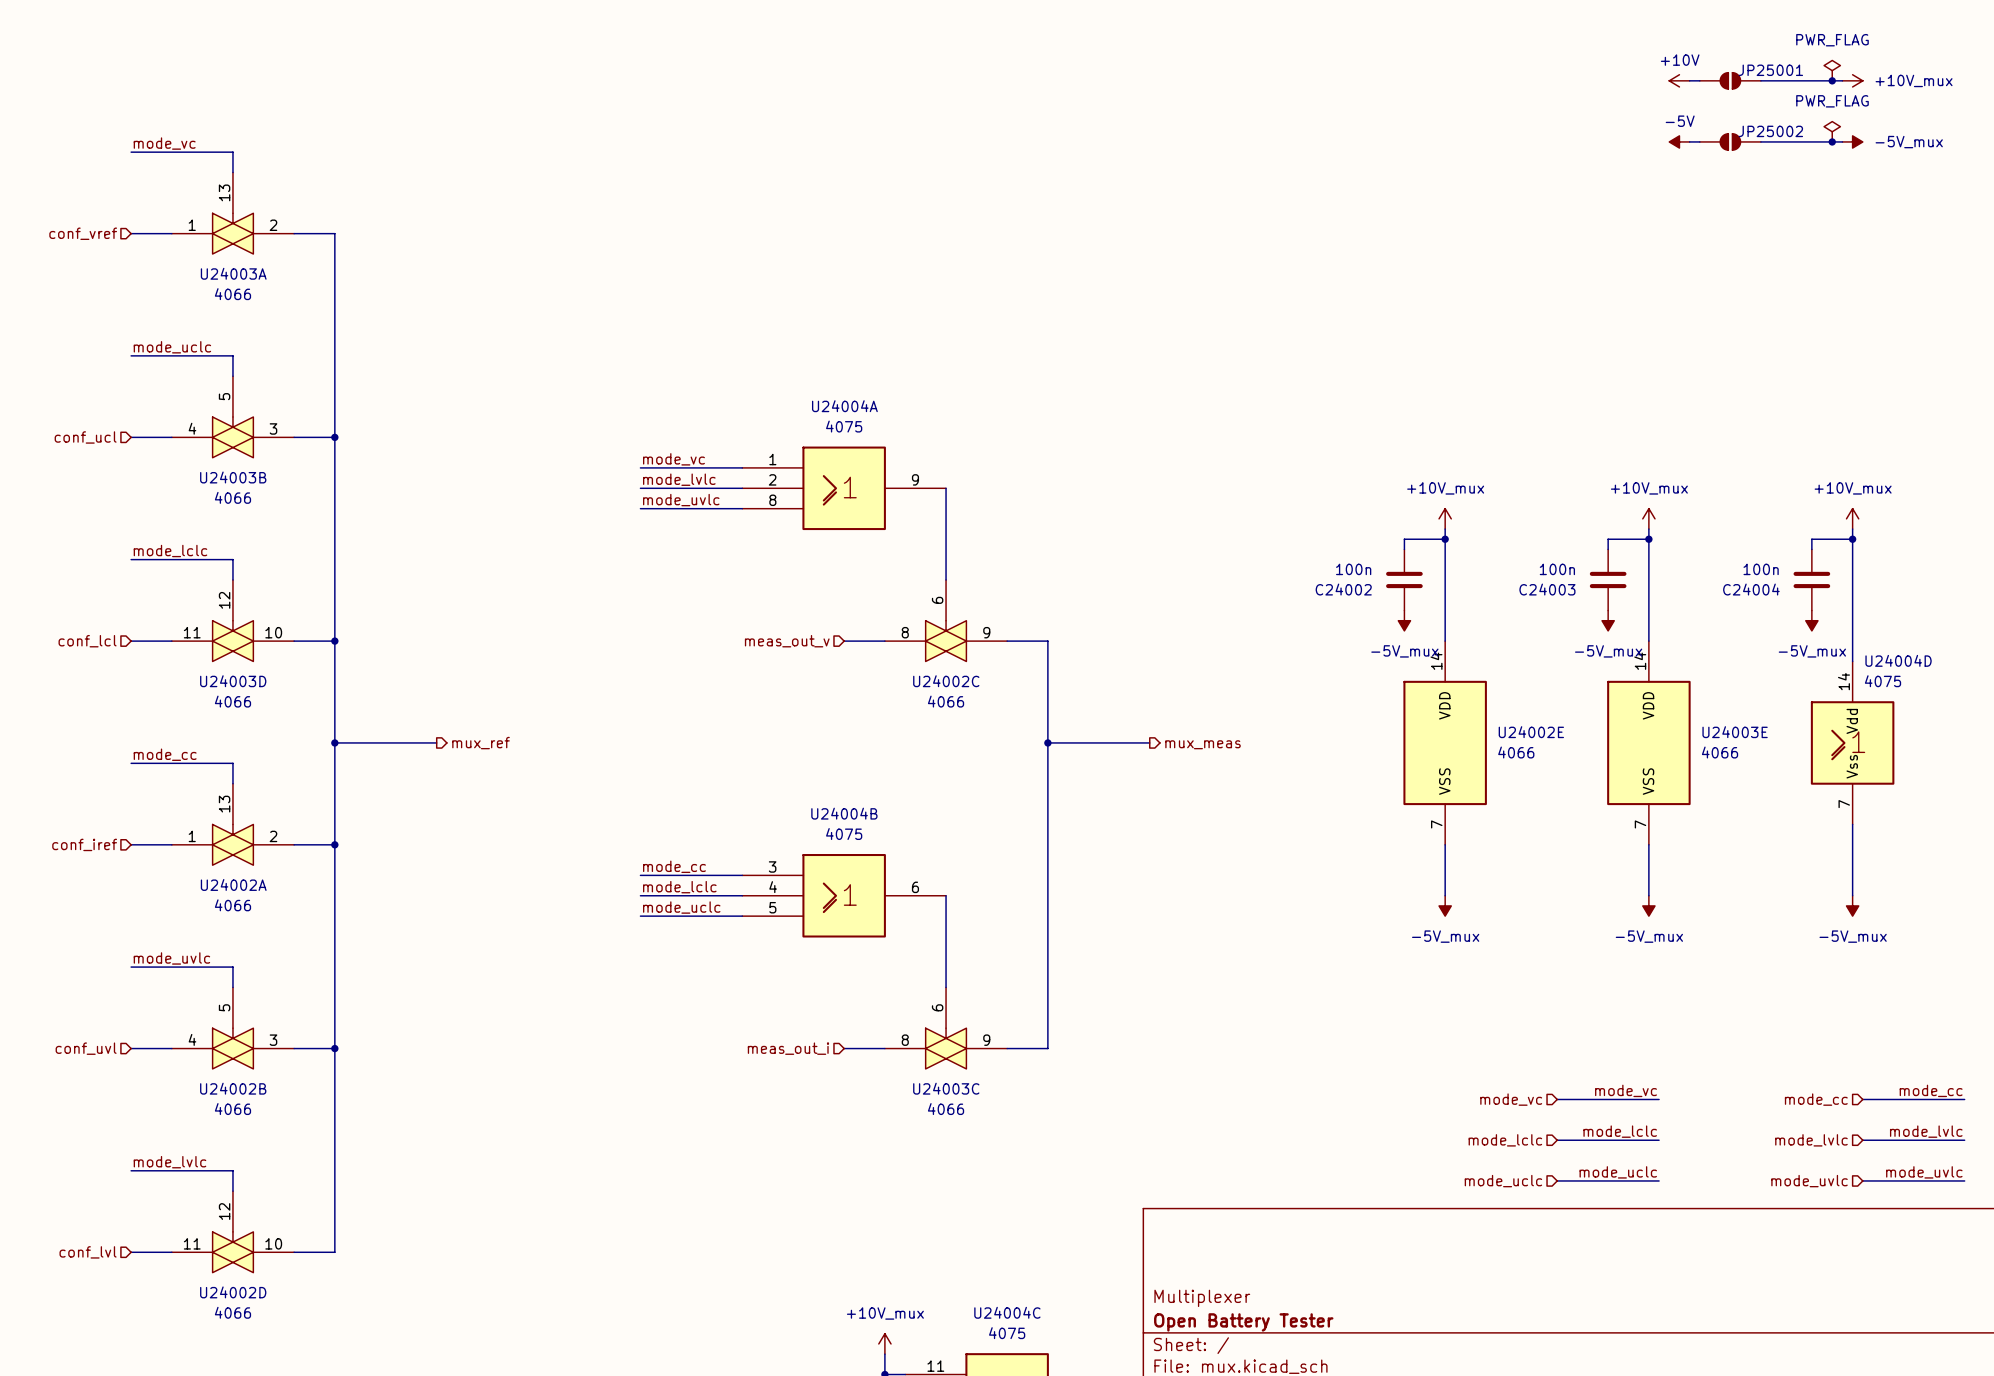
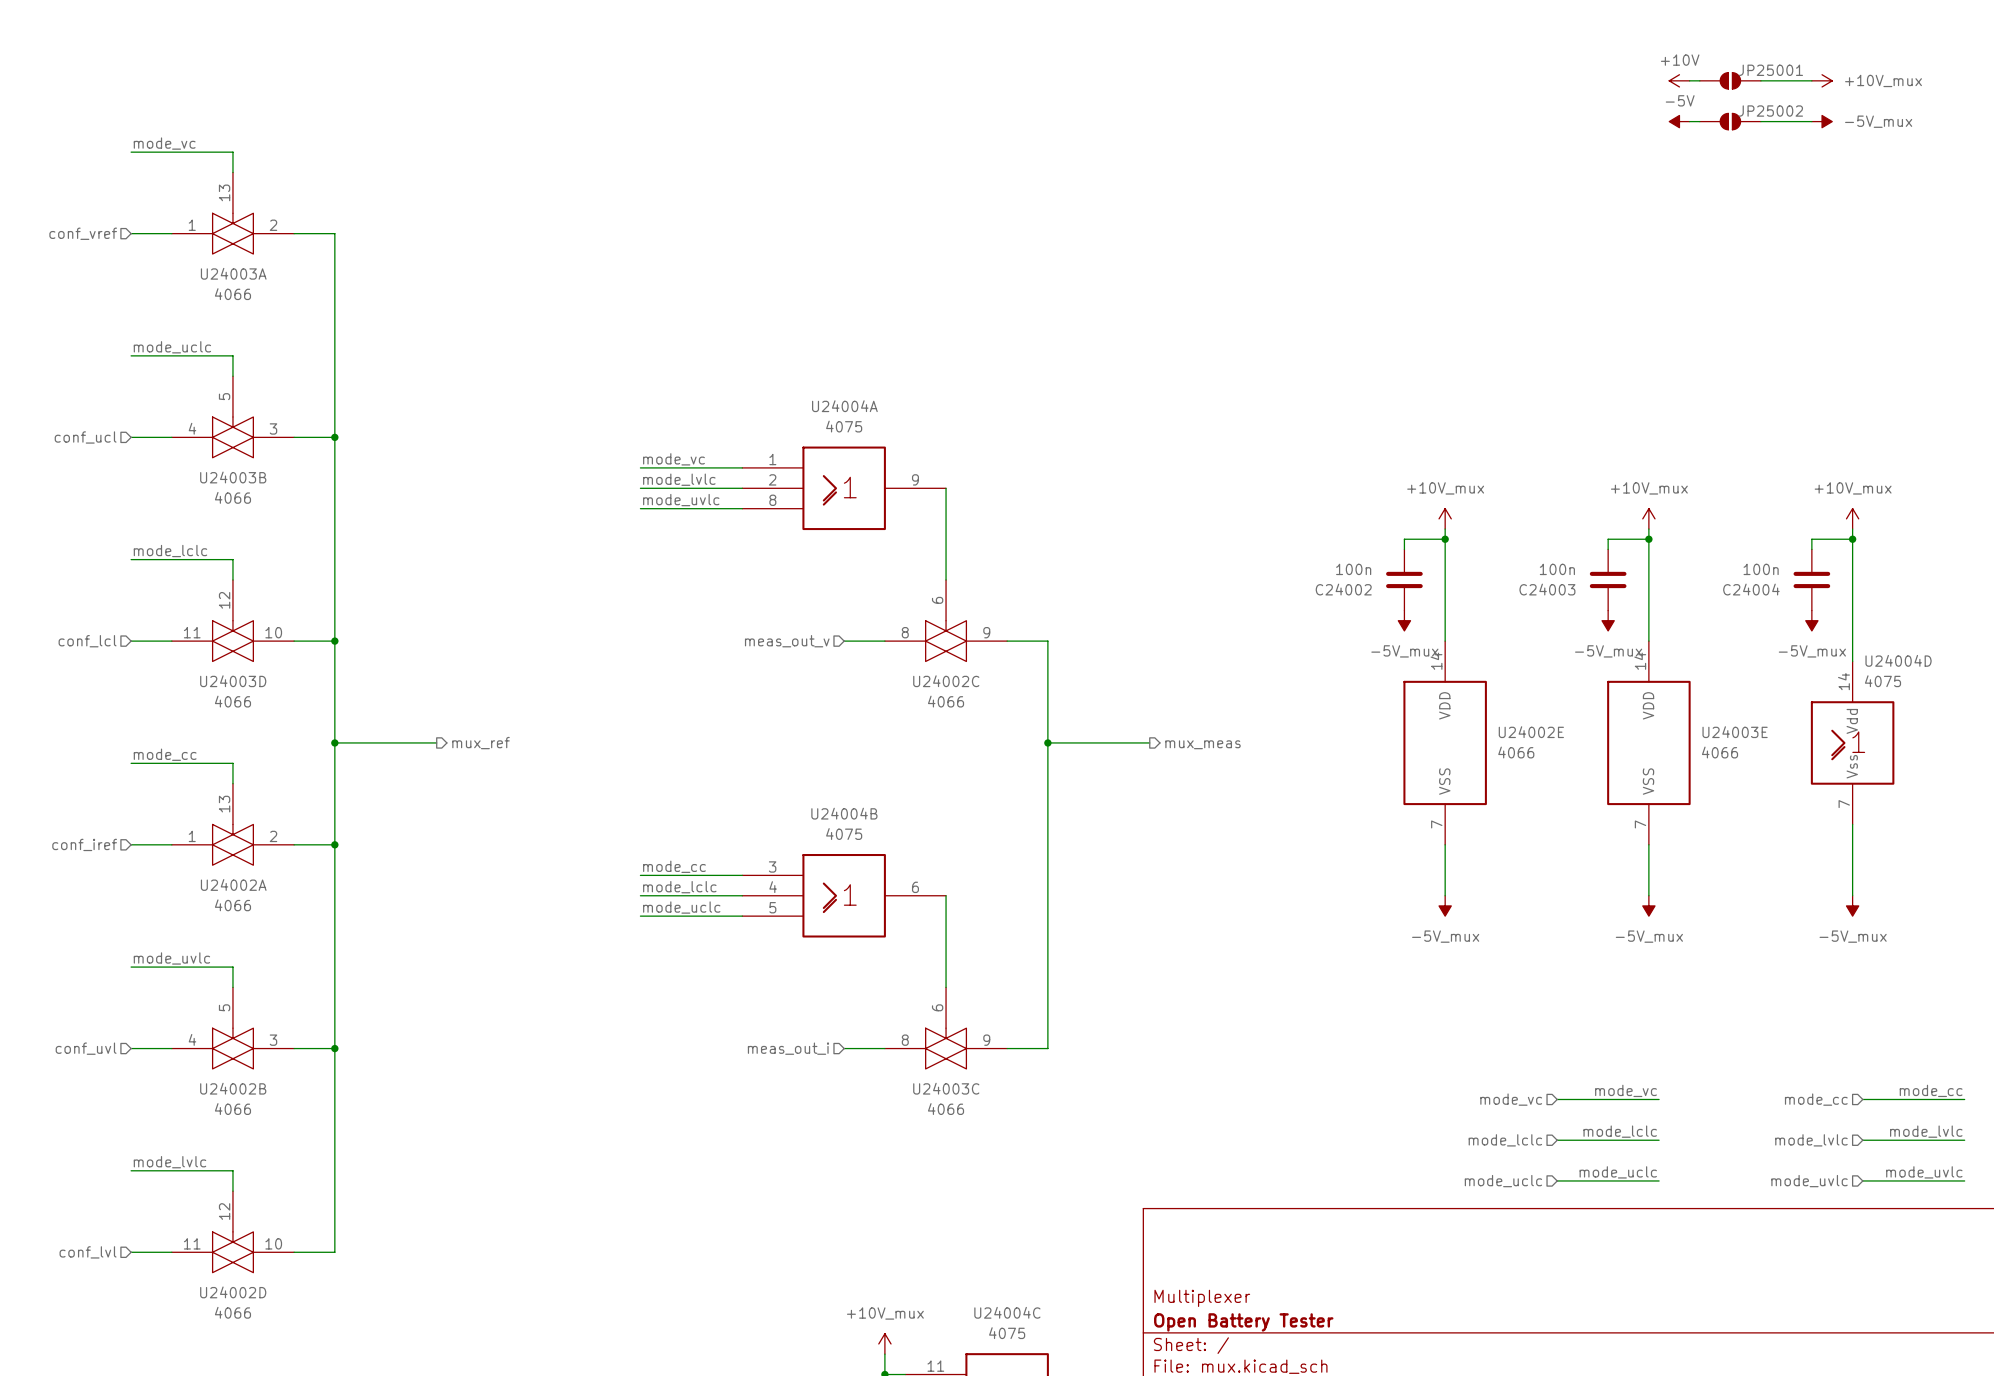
power symbol: PWR_FLAG (1832, 70) -> none
junction: (1832, 80) -> none
power symbol position: +10V_mux (1852, 80) -> +10V_mux (1822, 80)
wire: none -> (1760, 121) (1811, 121)
power symbol: PWR_FLAG (1832, 131) -> none
power symbol position: -5V (1679, 141) -> -5V (1679, 121)
wire: (1689, 141) (1699, 141) -> (1689, 121) (1699, 121)
JP25002 position: (1730, 141) -> (1730, 121)
wire: (1760, 141) (1842, 141) -> none
junction: (1832, 141) -> none
power symbol position: -5V_mux (1852, 141) -> -5V_mux (1822, 121)

